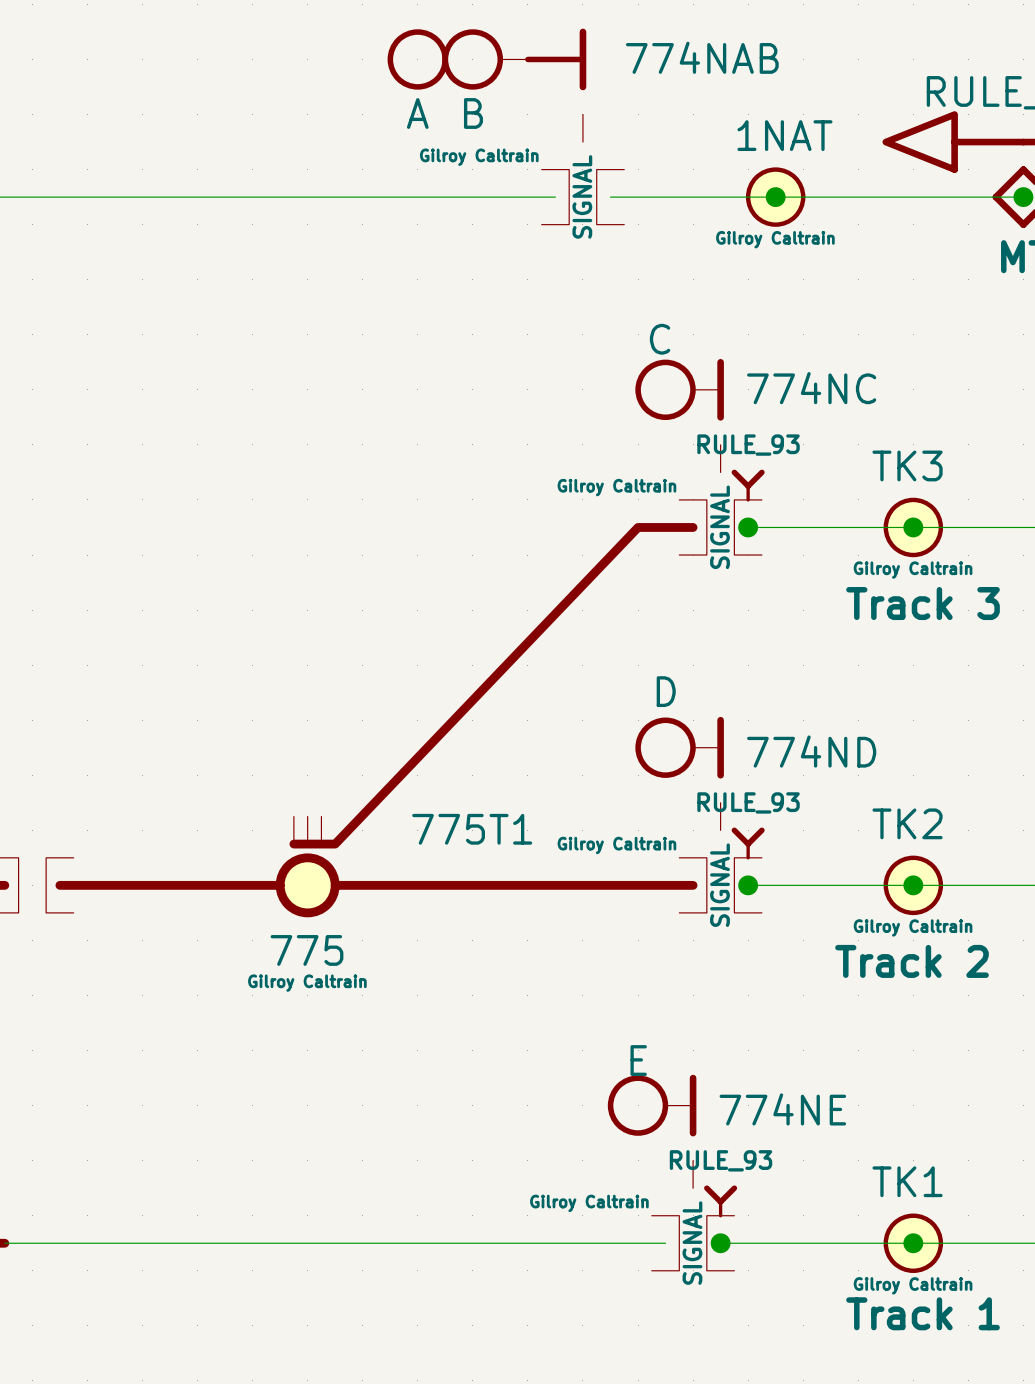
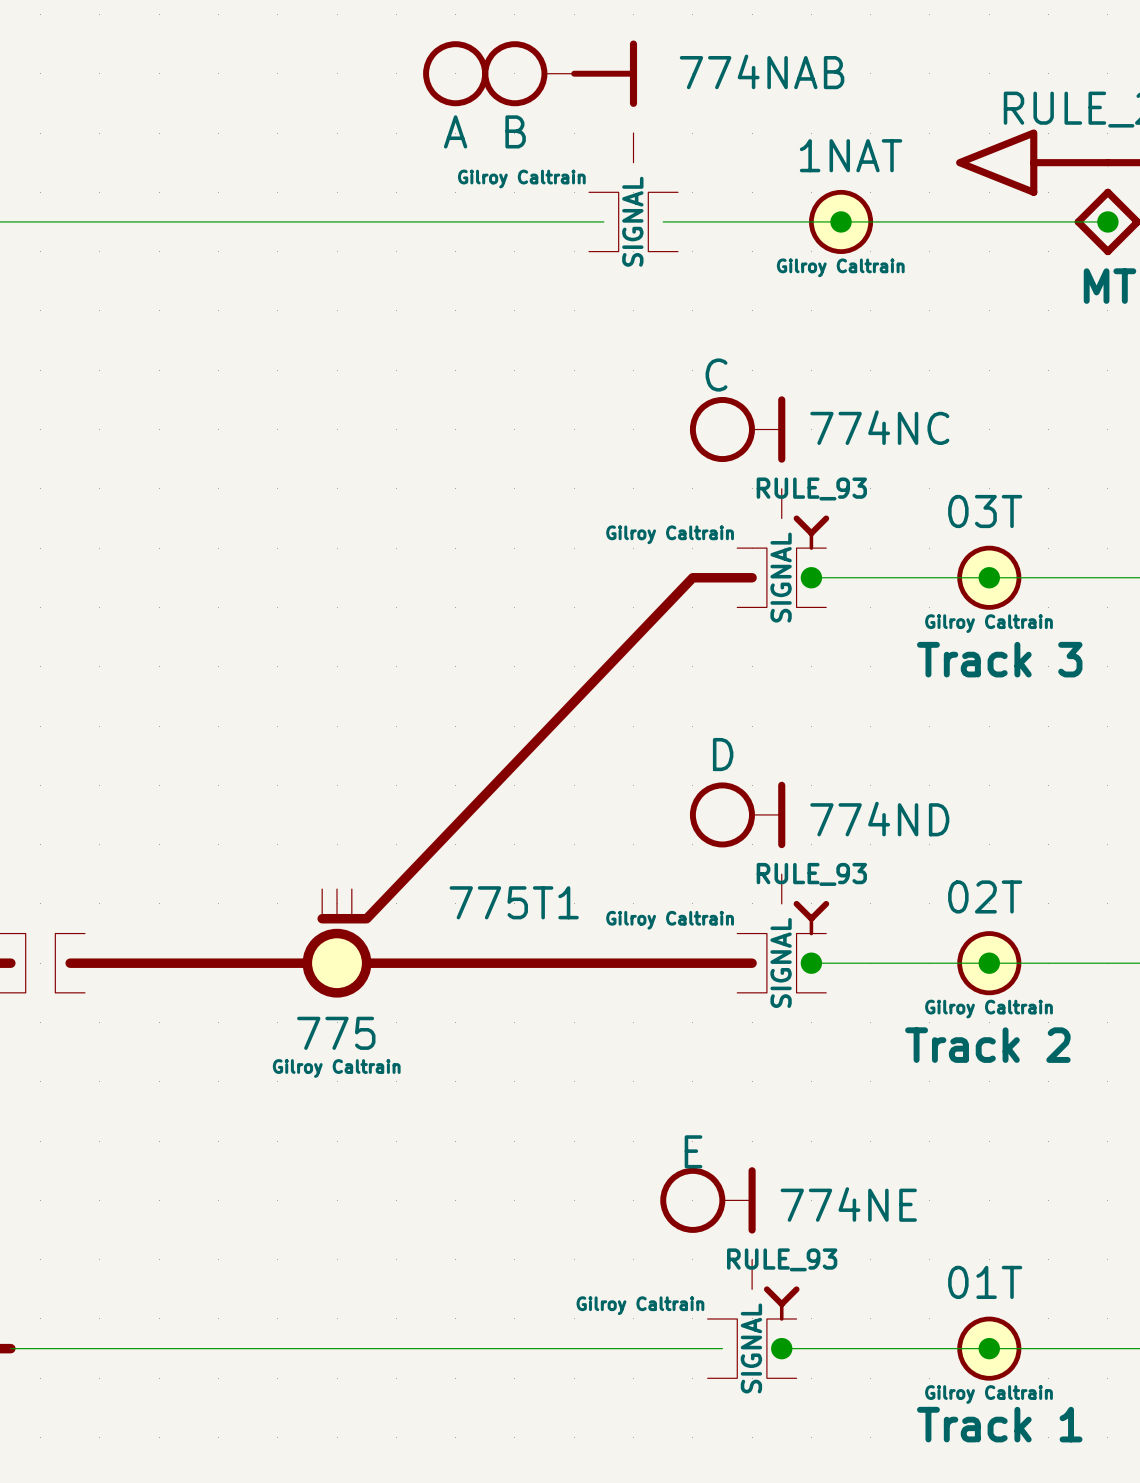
part value: TK3 (907, 465) -> 03T (985, 511)
part value: TK2 (907, 823) -> 02T (985, 896)
part value: TK1 (907, 1181) -> 01T (985, 1282)

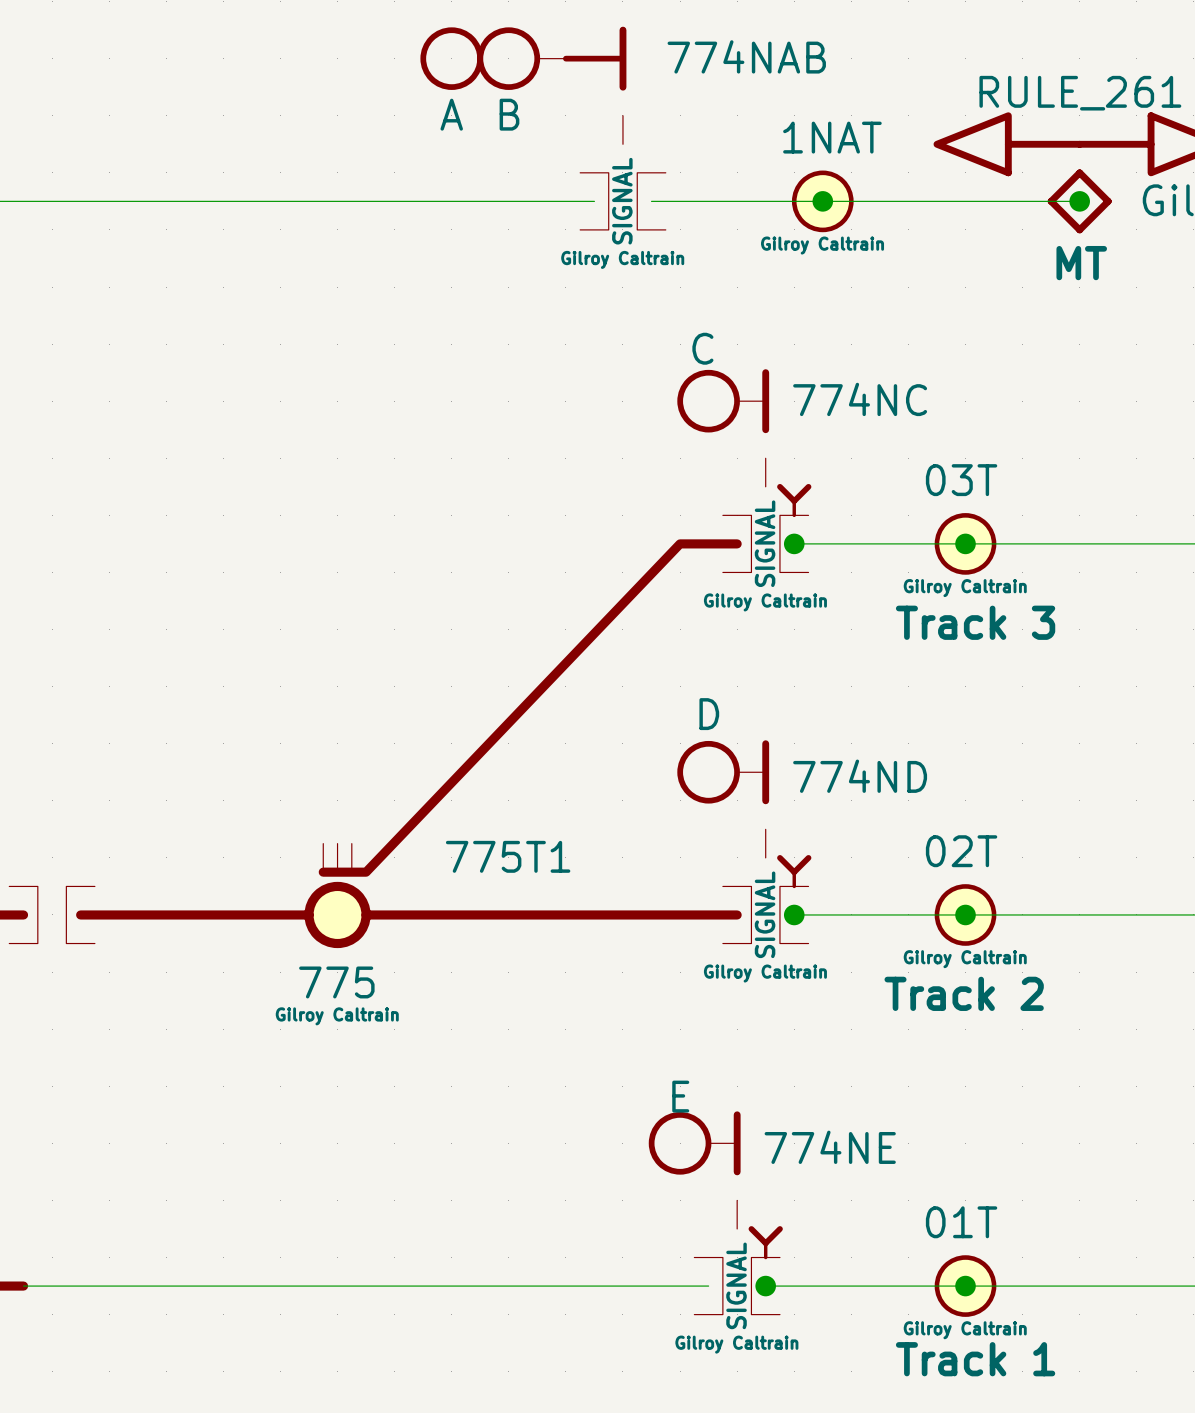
part text position: Gilroy Caltrain (521, 179) -> Gilroy Caltrain (622, 259)
part text: RULE_93 (811, 488) -> none
part text position: Gilroy Caltrain (670, 534) -> Gilroy Caltrain (765, 602)
part text: RULE_93 (811, 874) -> none
part text position: Gilroy Caltrain (670, 920) -> Gilroy Caltrain (765, 973)
part text: RULE_93 (782, 1259) -> none
part text position: Gilroy Caltrain (640, 1305) -> Gilroy Caltrain (736, 1344)

